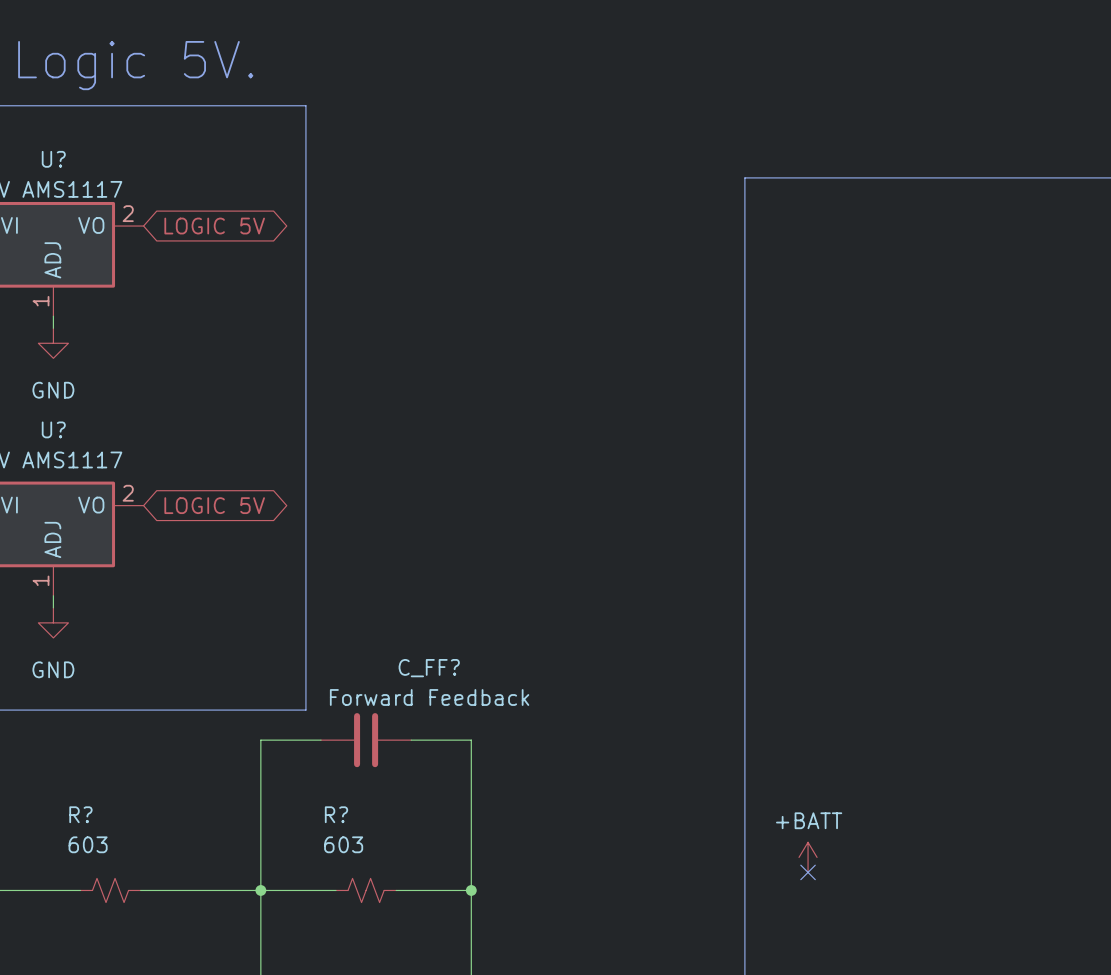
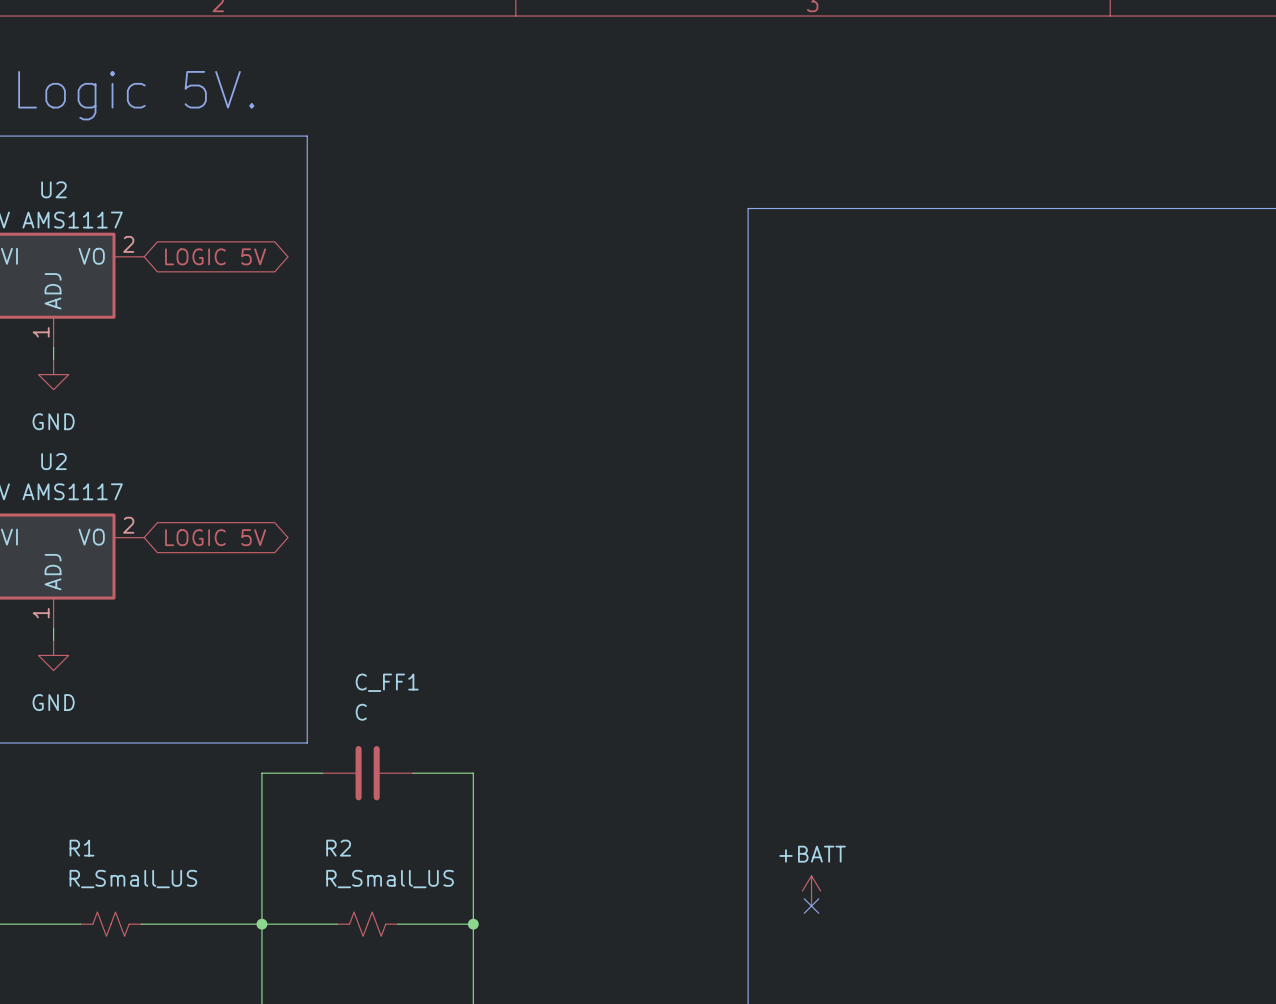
U? name: U? (53, 159) -> U2 (53, 189)
U? name: U? (53, 429) -> U2 (53, 461)
C_FF? name: C_FF? (429, 668) -> C_FF1 (387, 682)
C_FF? value: Forward Feedback (429, 697) -> C (361, 712)
R? name: R? (80, 814) -> R1 (81, 848)
R? name: R? (336, 814) -> R2 (338, 848)
R? value: 603 (88, 844) -> R_Small_US (133, 879)
R? value: 603 (343, 844) -> R_Small_US (390, 879)

